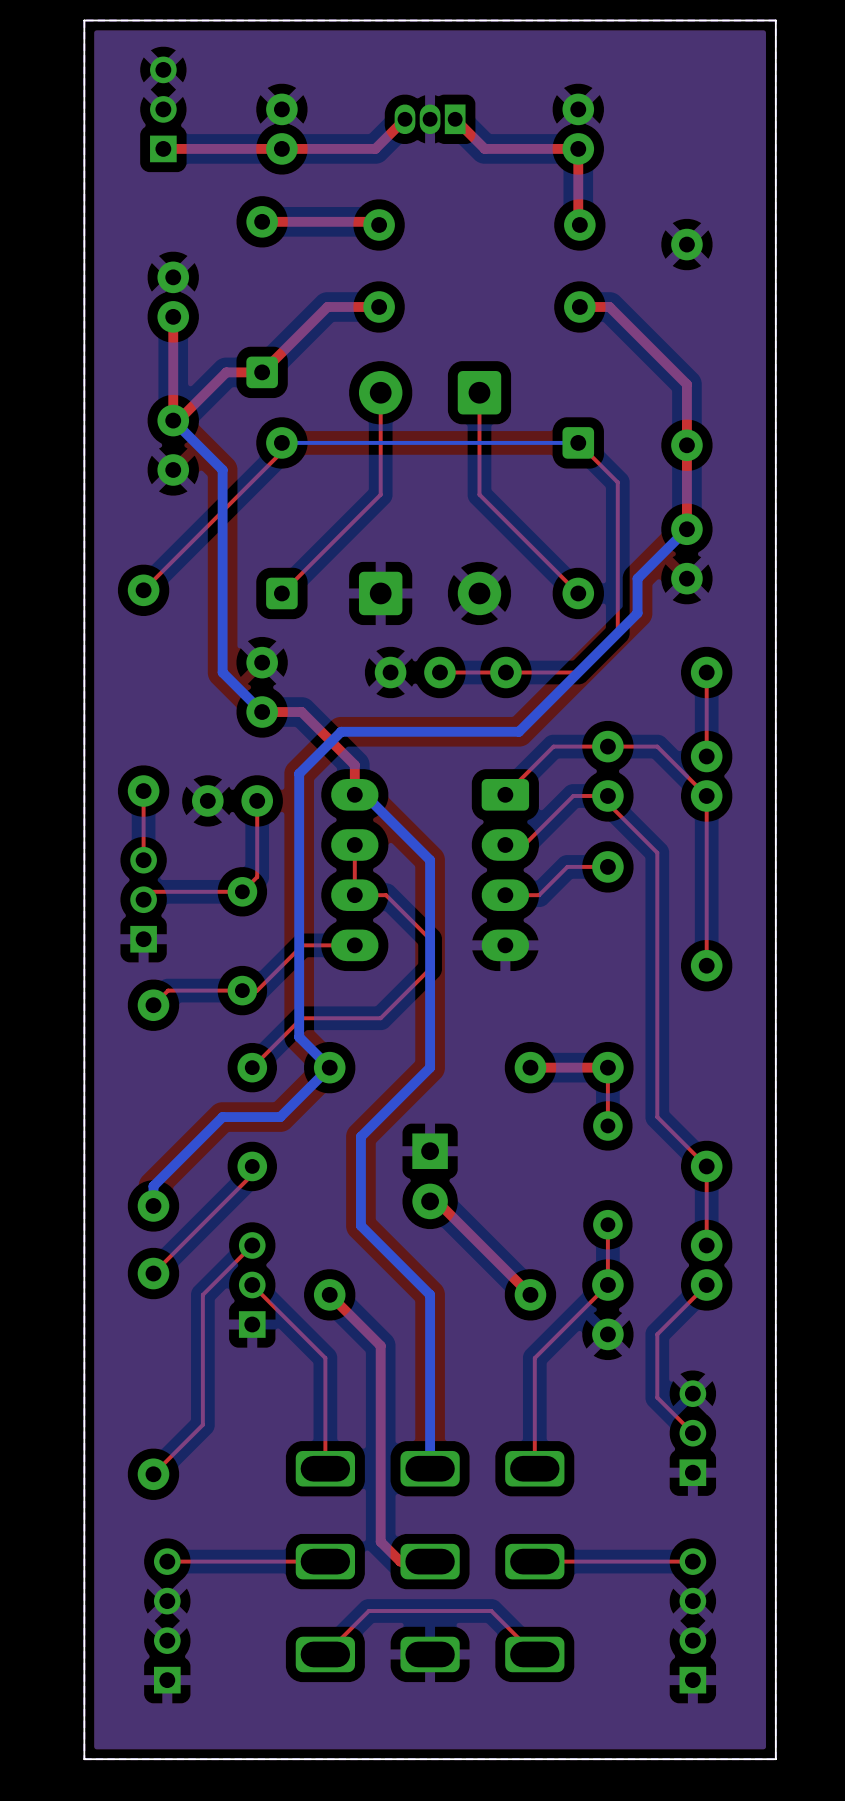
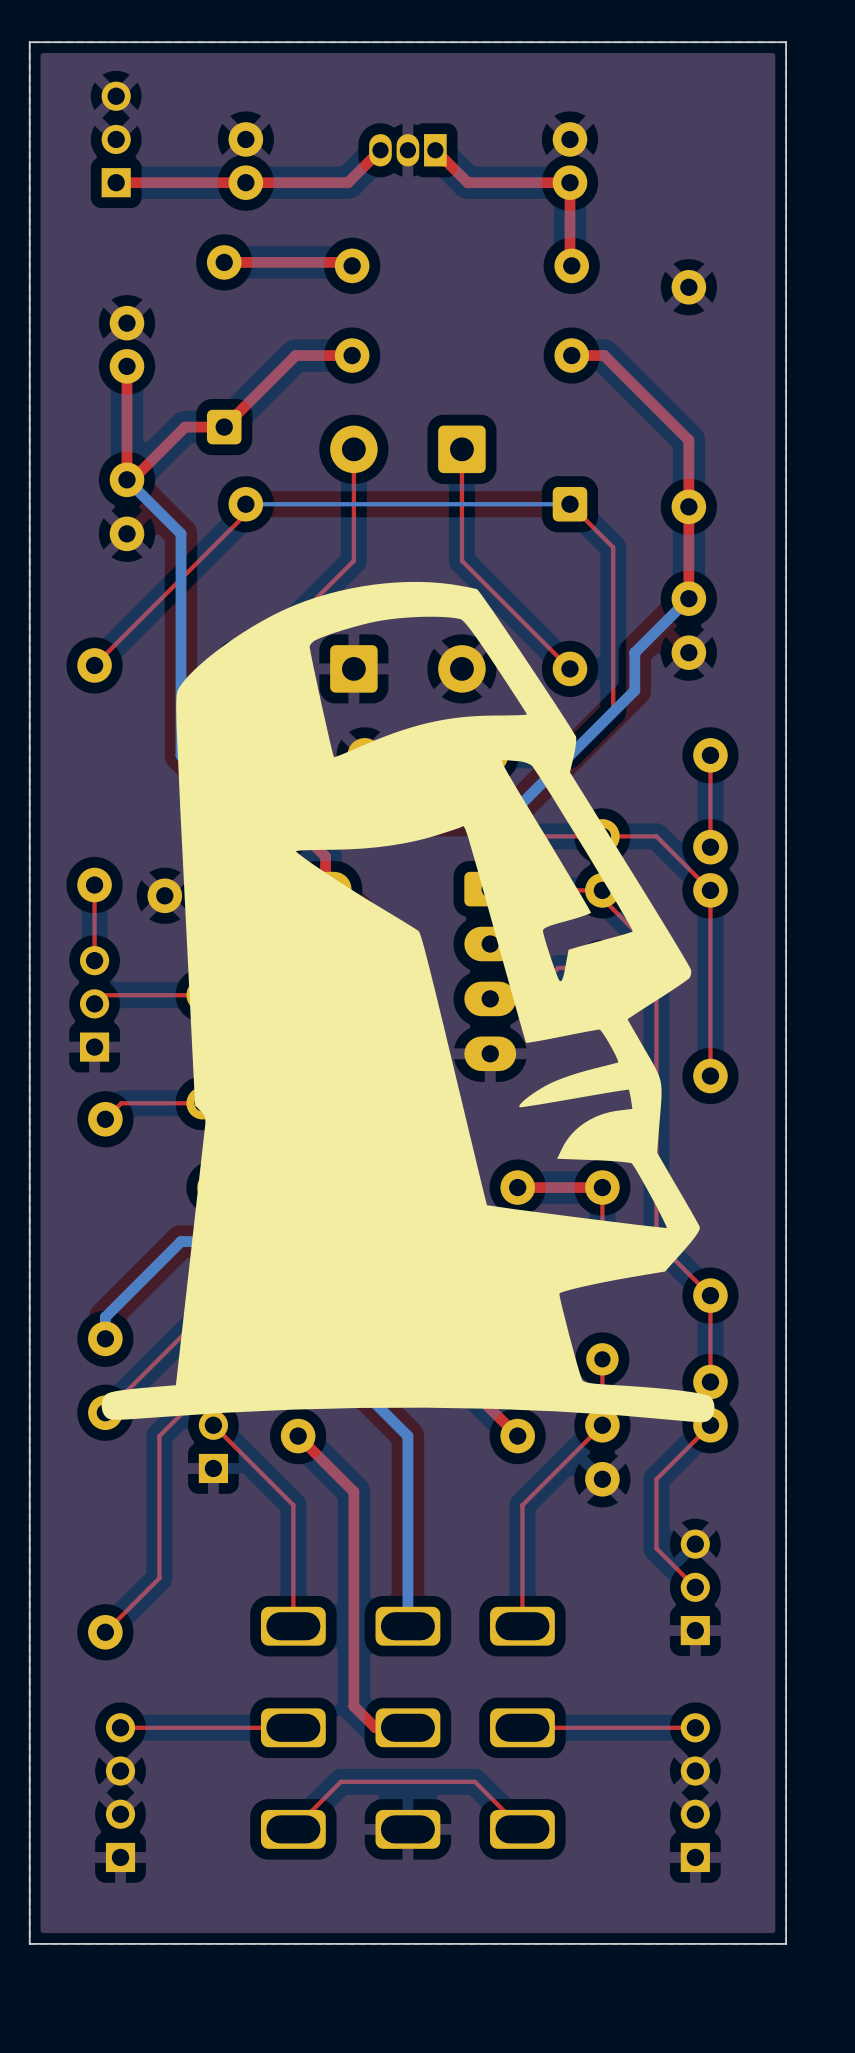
drawing: none -> [101, 581, 715, 1423]

